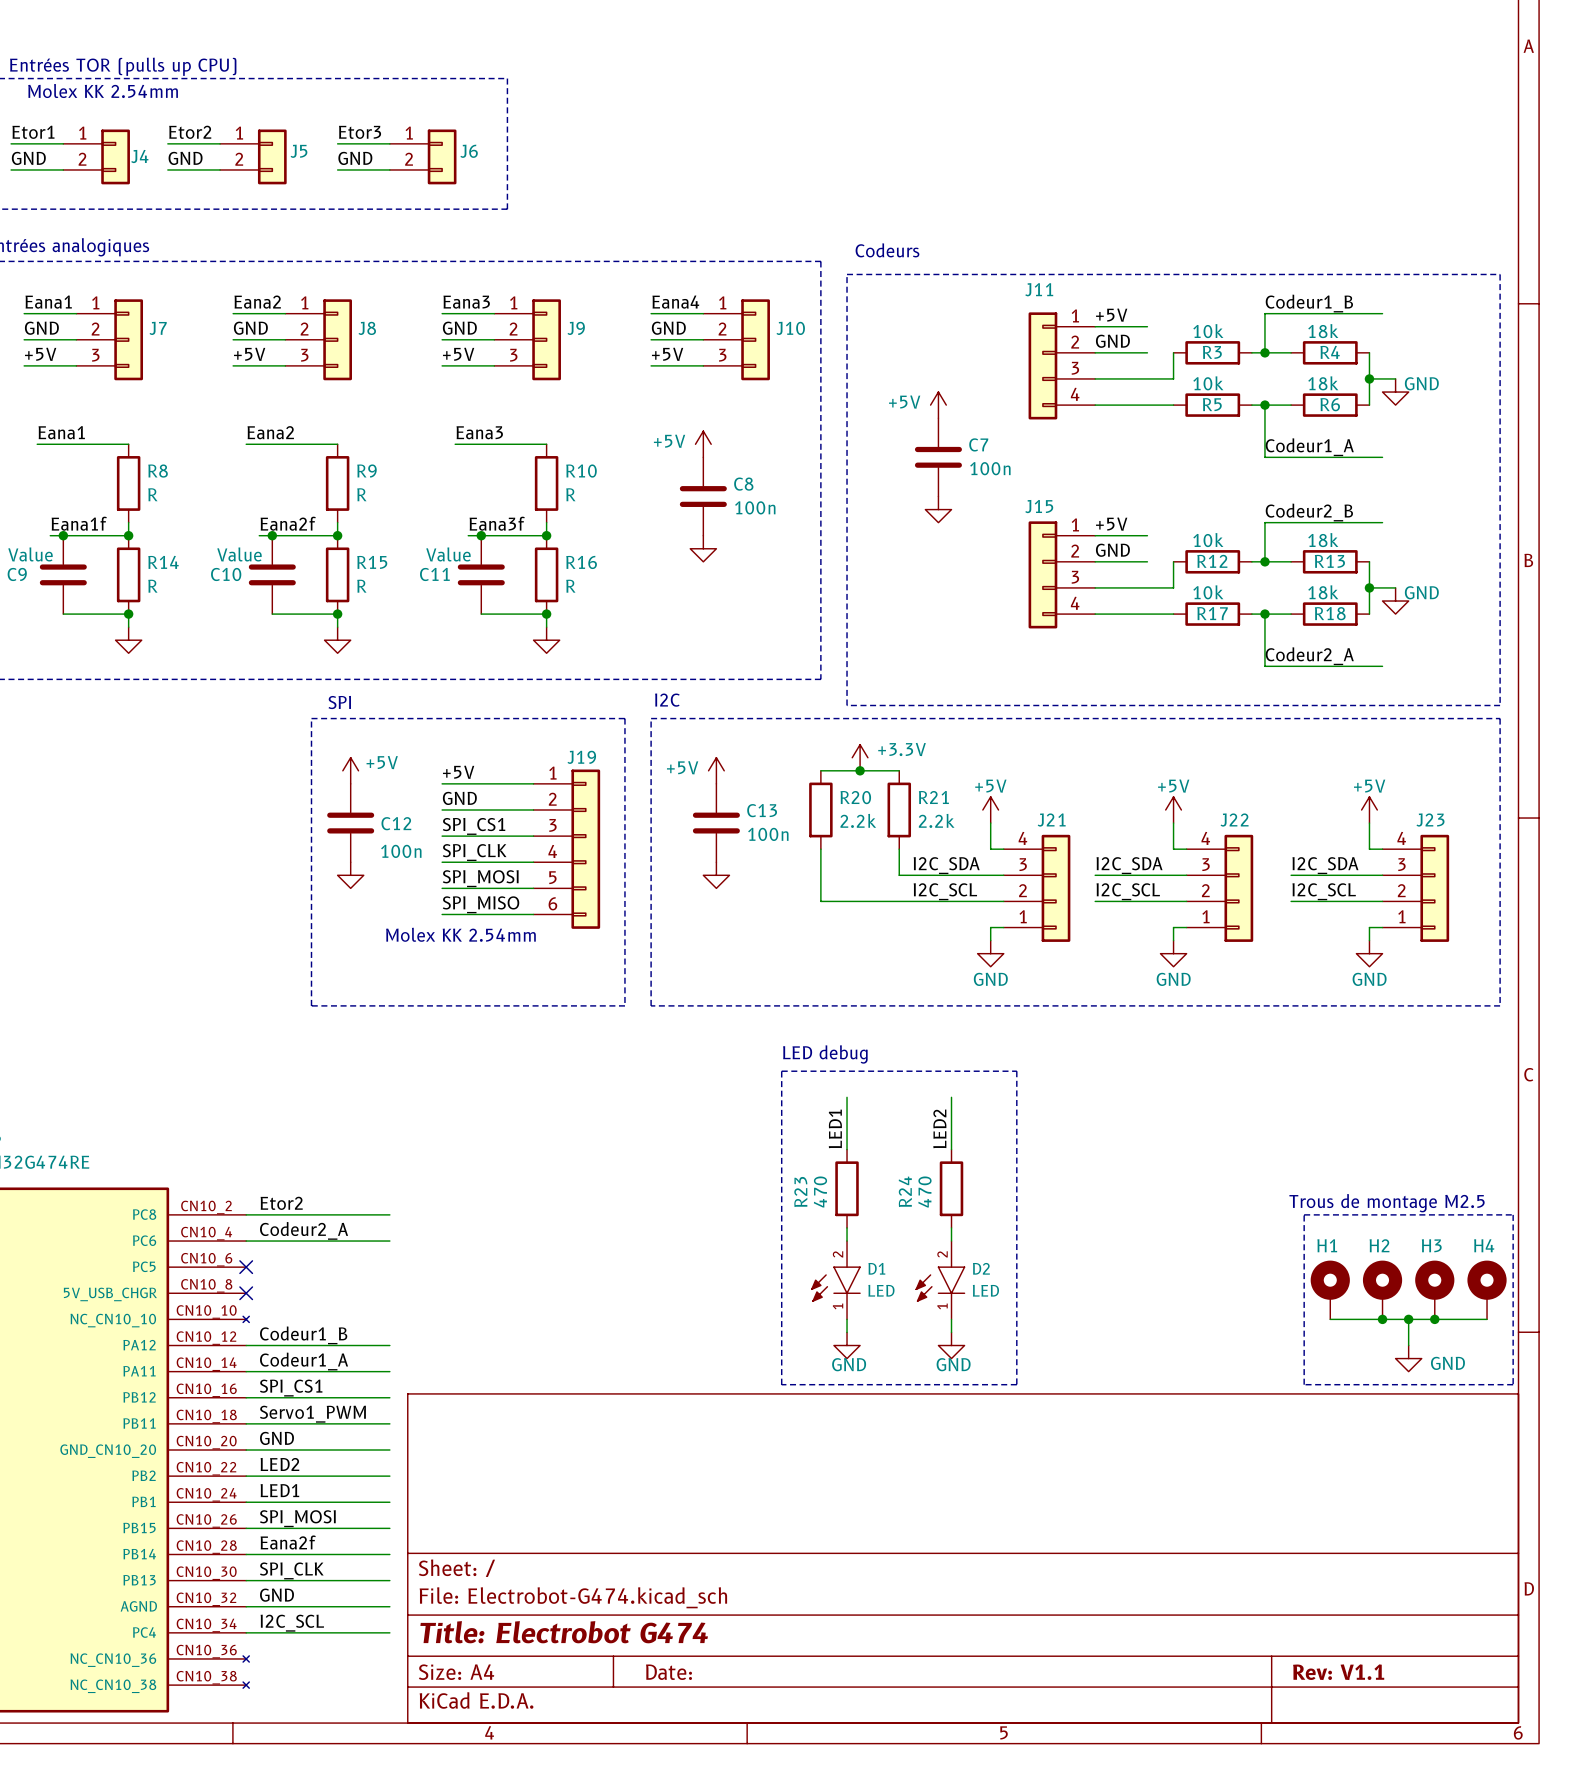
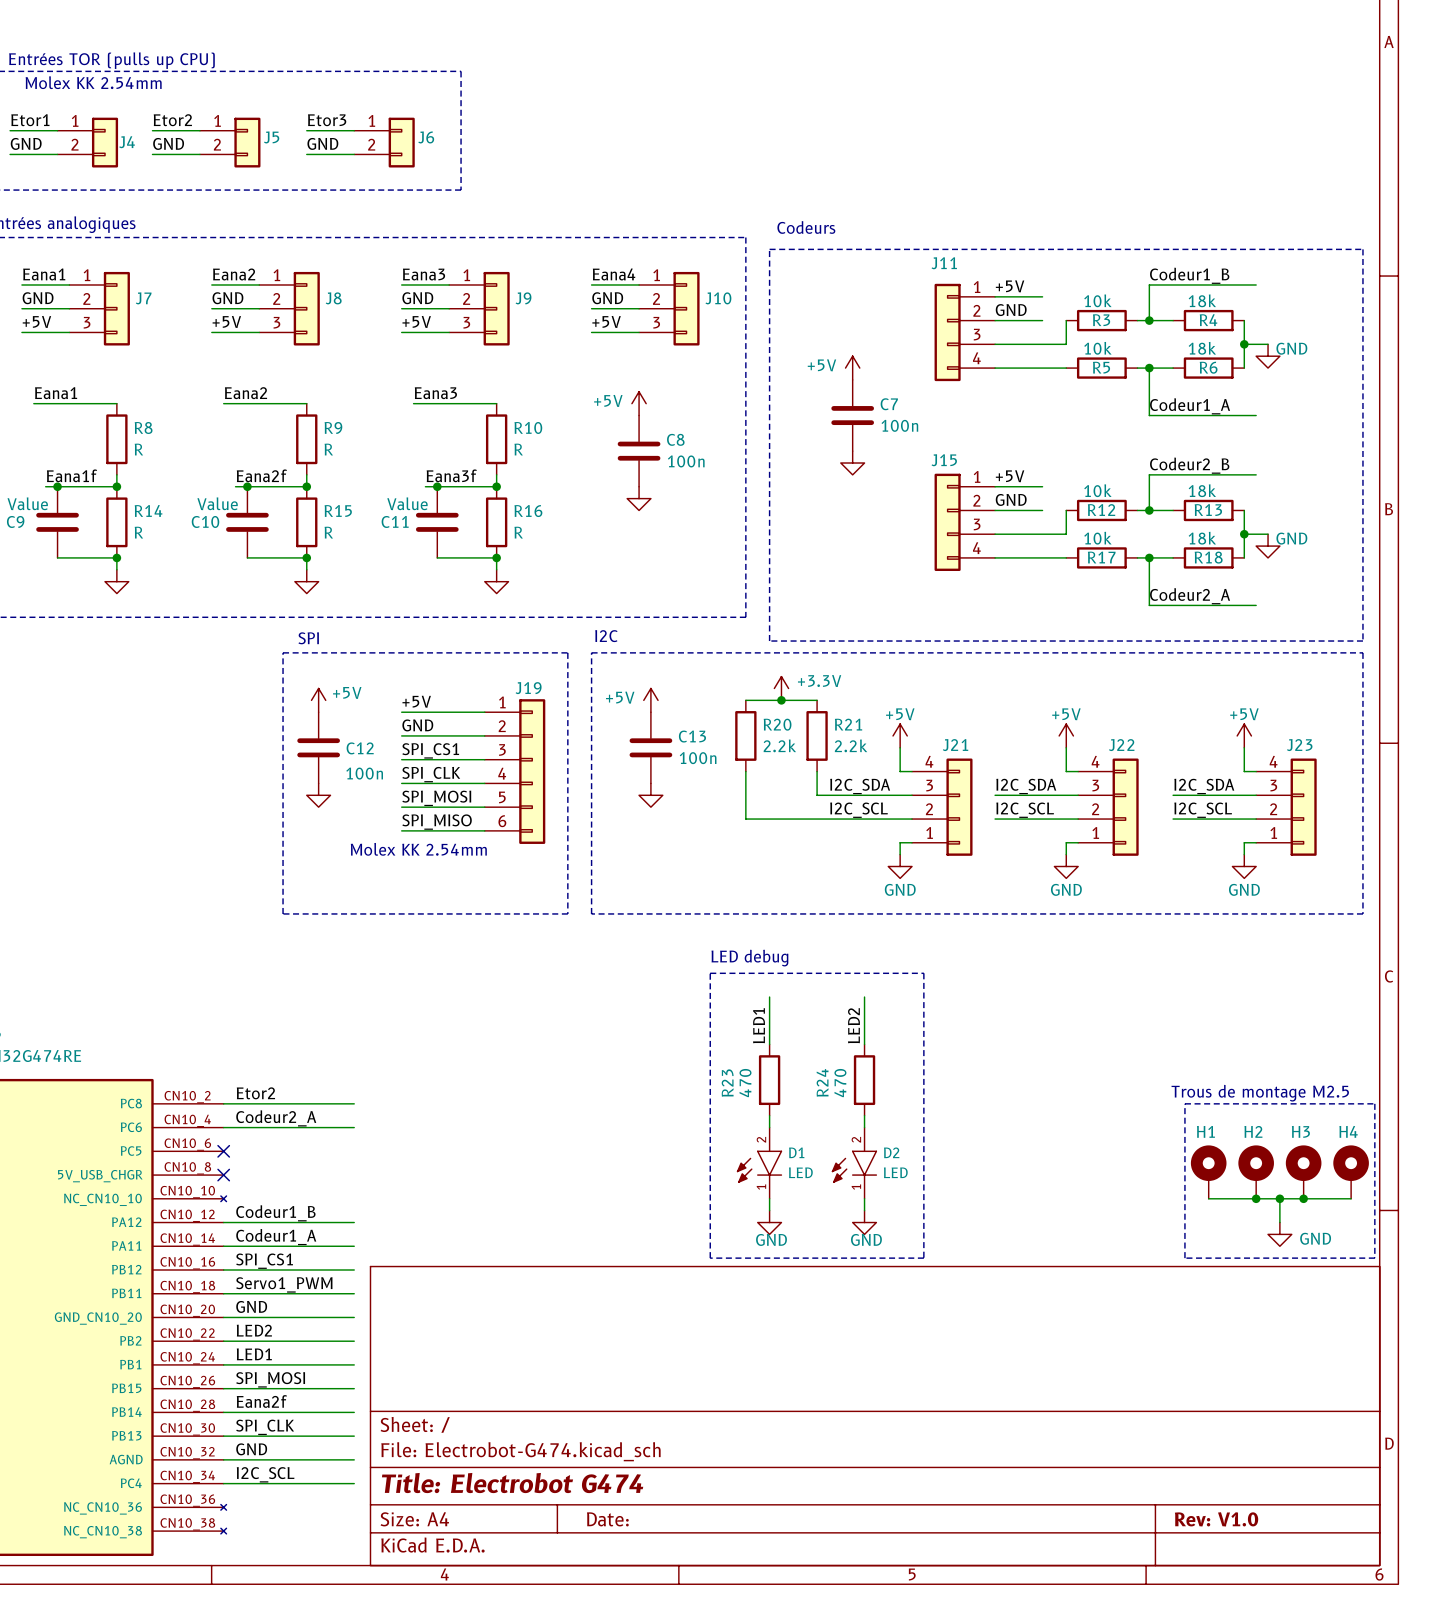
title block: Rev: V1.1 (1338, 1672) -> Rev: V1.0 (1216, 1519)

